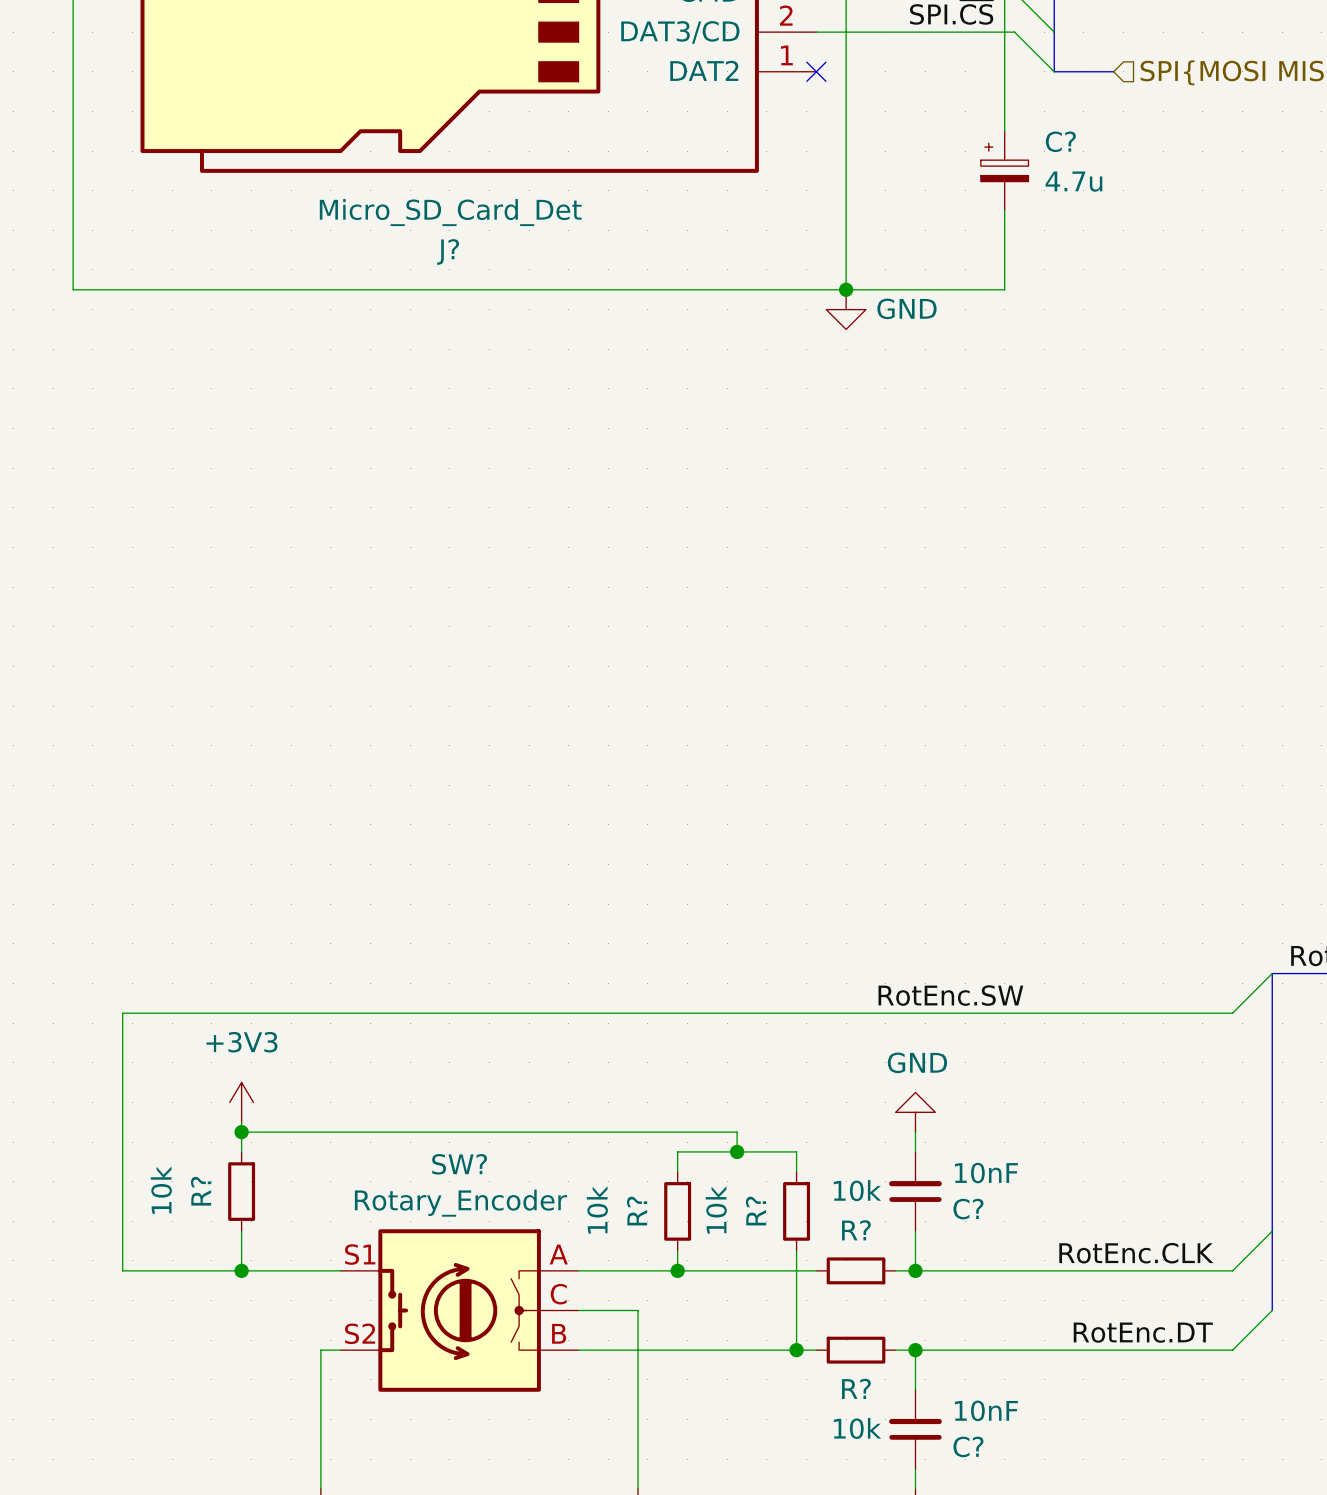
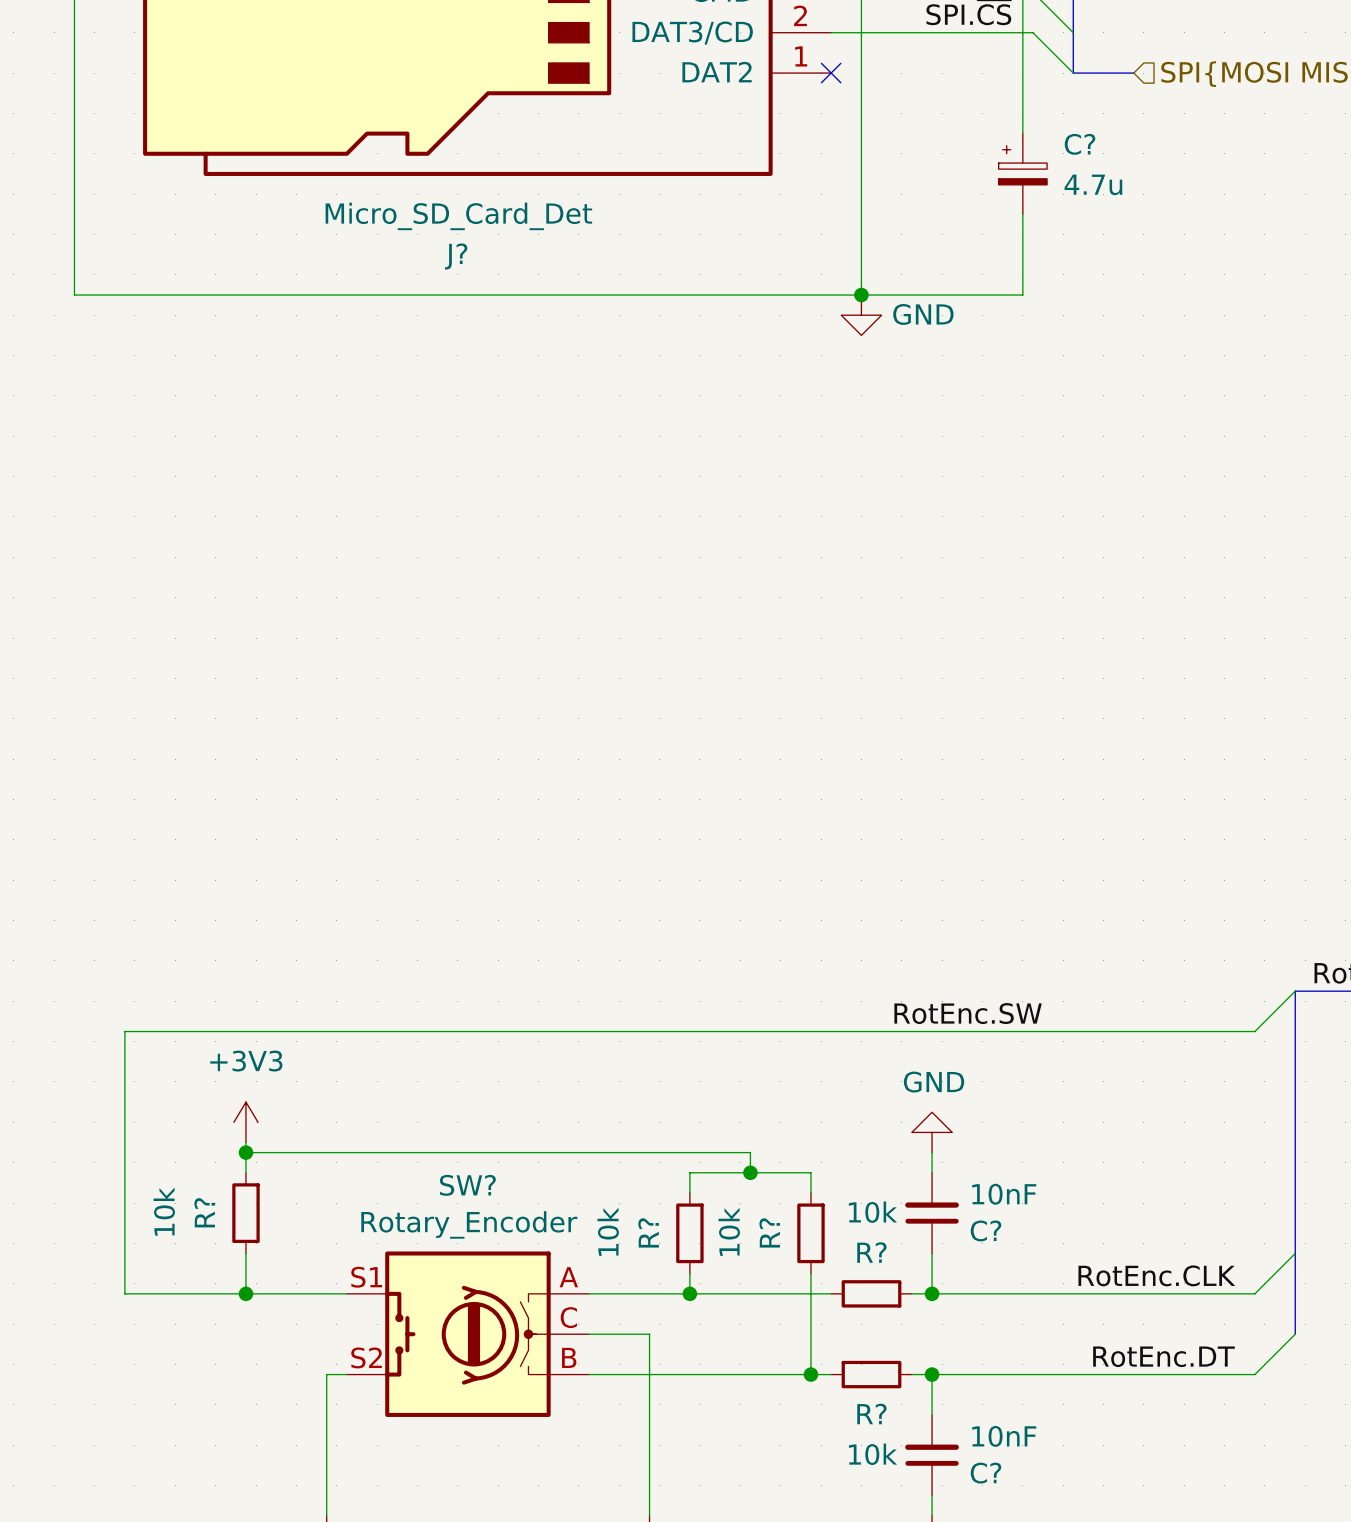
SW? symbol: [340, 1229, 579, 1392] -> [346, 1251, 590, 1417]

